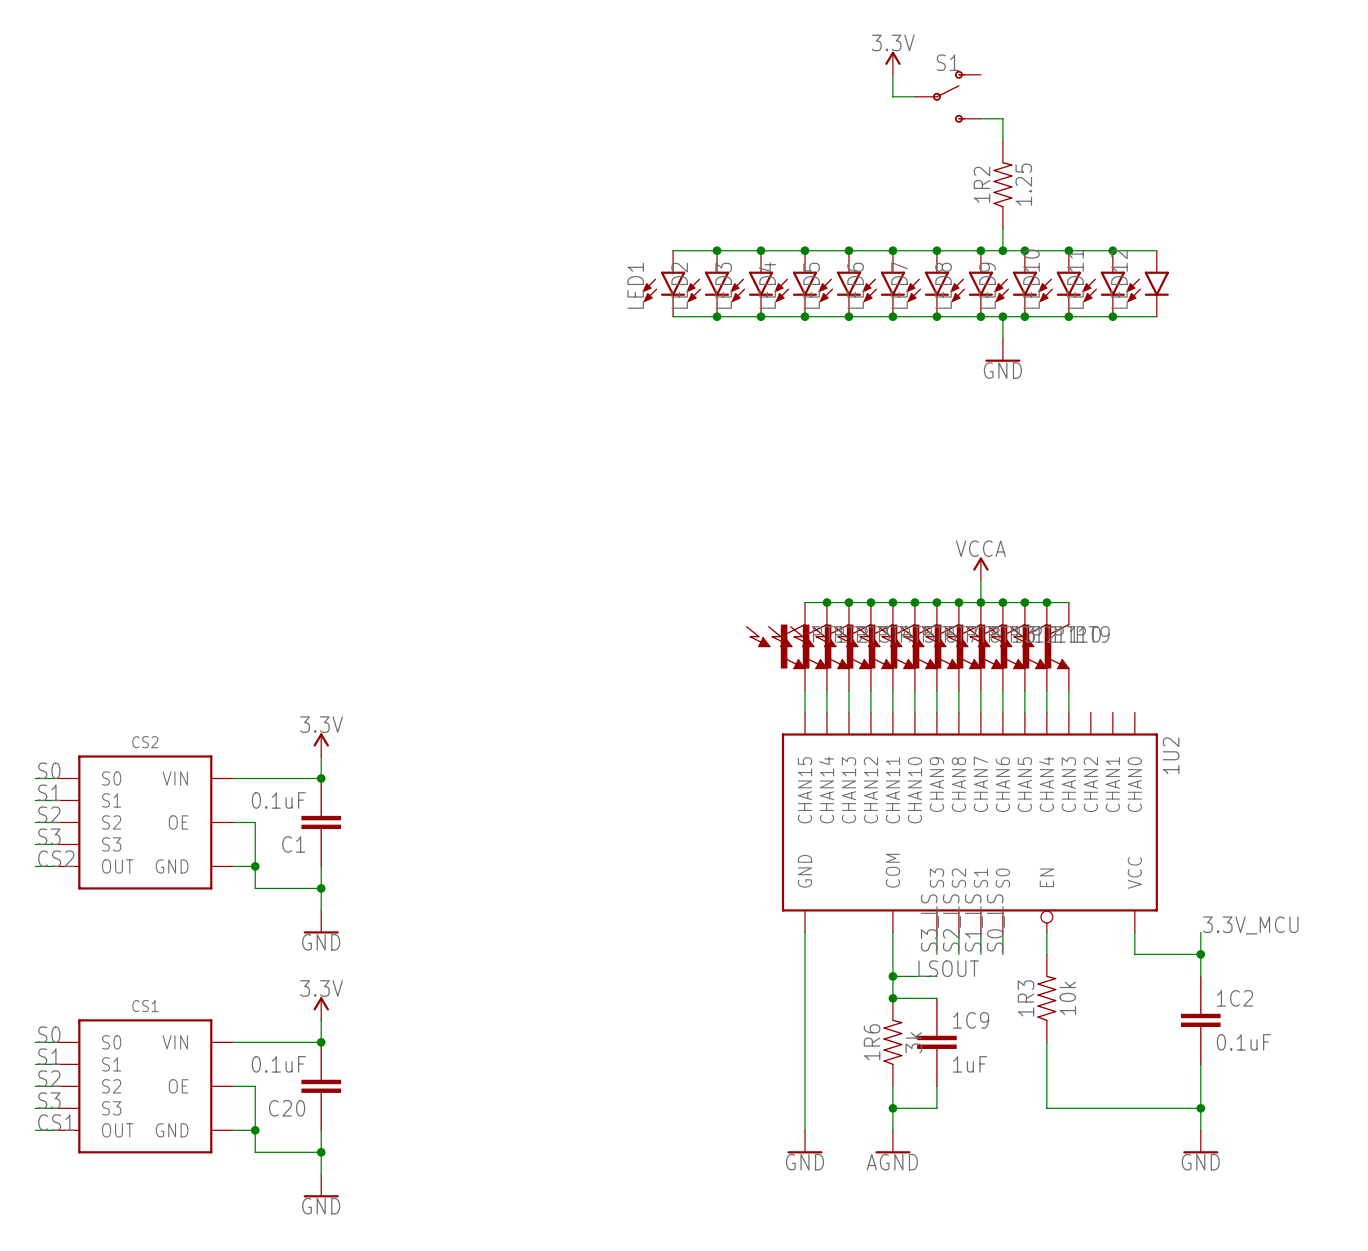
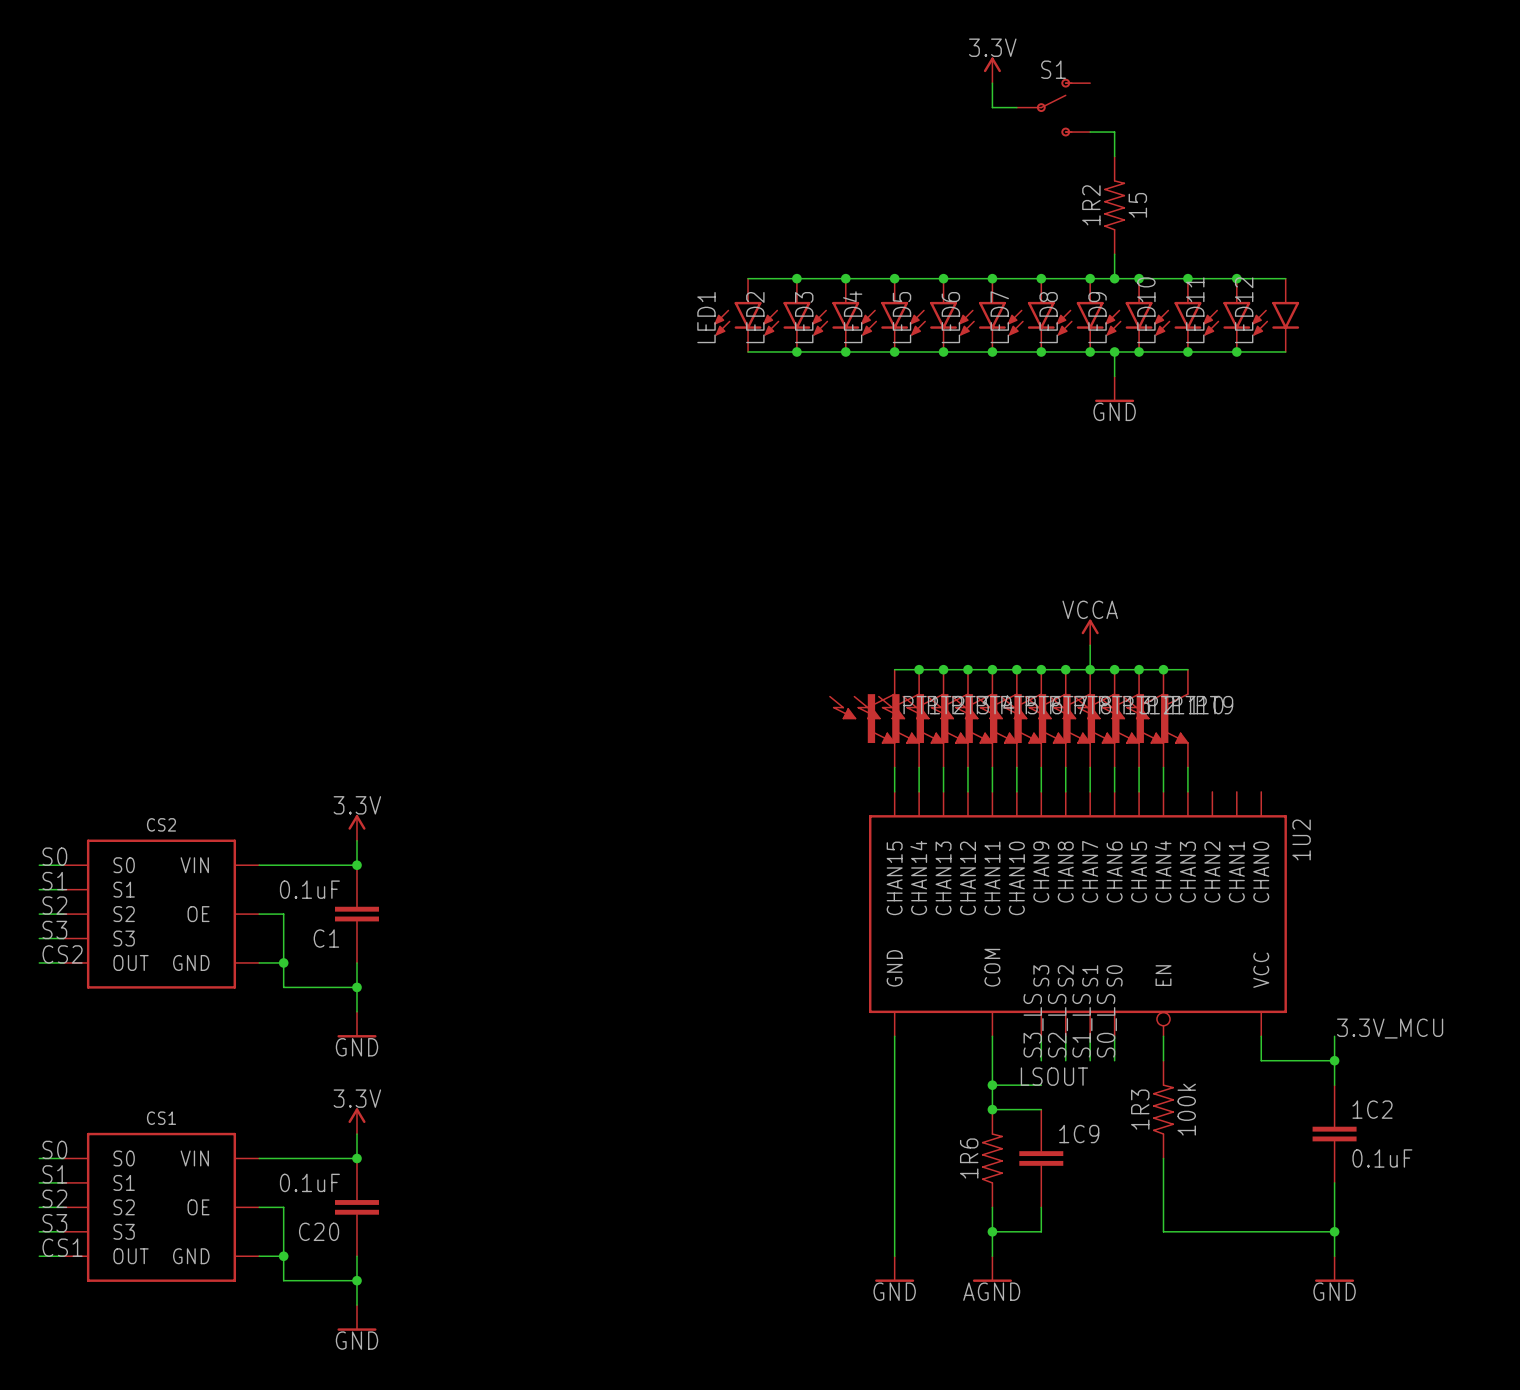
1R2 value: 1.25 (1023, 184) -> 15 (1137, 205)
1R3 value: 10k (1067, 998) -> 100k (1186, 1109)
1R6 value: 3k (913, 1042) -> none
1C9 value: 1uF (970, 1064) -> none

